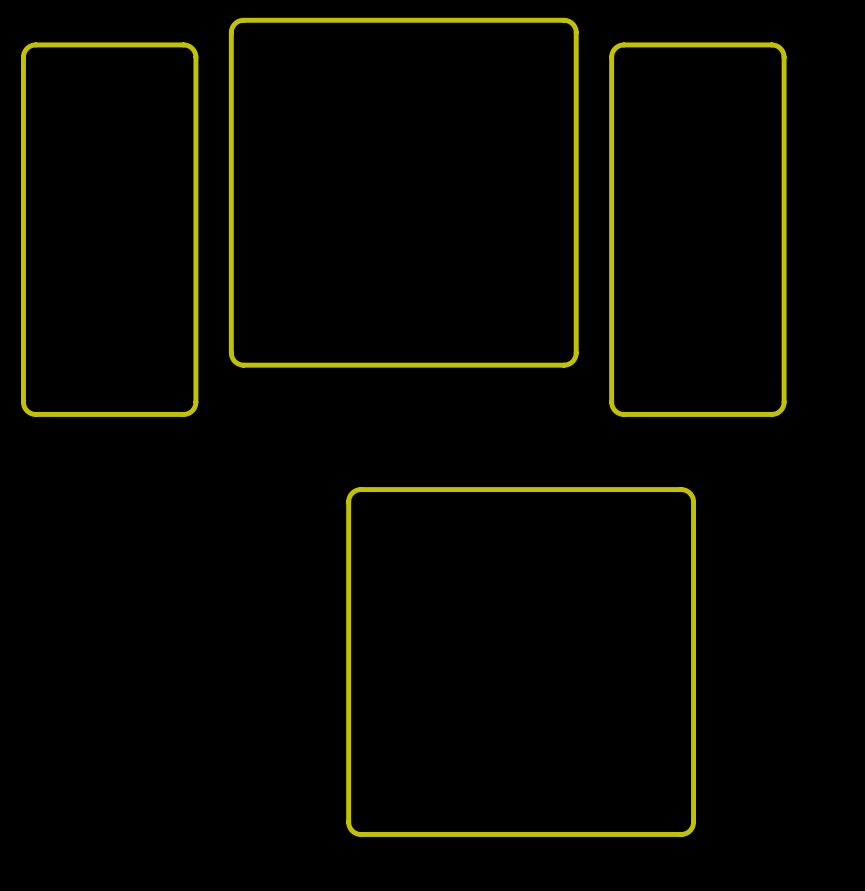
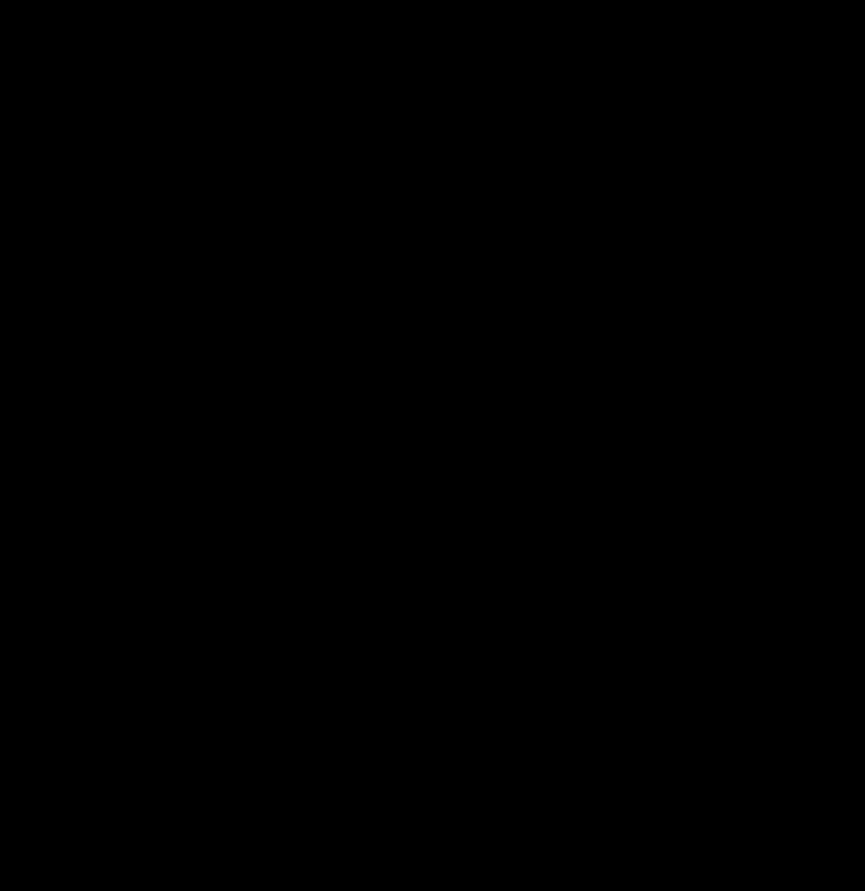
board edge: (563, 20) (243, 20) (234, 23) (231, 32) (231, 352) (234, 361) (243, 365) (563, 365) (572, 361) (576, 352) (576, 32) (572, 23) (563, 20) -> none
board edge: (183, 44) (35, 44) (28, 47) (24, 52) (23, 402) (26, 409) (31, 413) (183, 414) (191, 411) (194, 406) (195, 57) (192, 48) (183, 44) -> none
board edge: (771, 44) (623, 44) (616, 47) (612, 52) (611, 402) (614, 409) (619, 413) (771, 414) (779, 411) (783, 406) (784, 57) (780, 48) (771, 44) -> none
board edge: (681, 489) (360, 489) (352, 493) (348, 501) (348, 822) (352, 830) (360, 834) (681, 834) (689, 830) (693, 822) (693, 501) (689, 493) (681, 489) -> none

